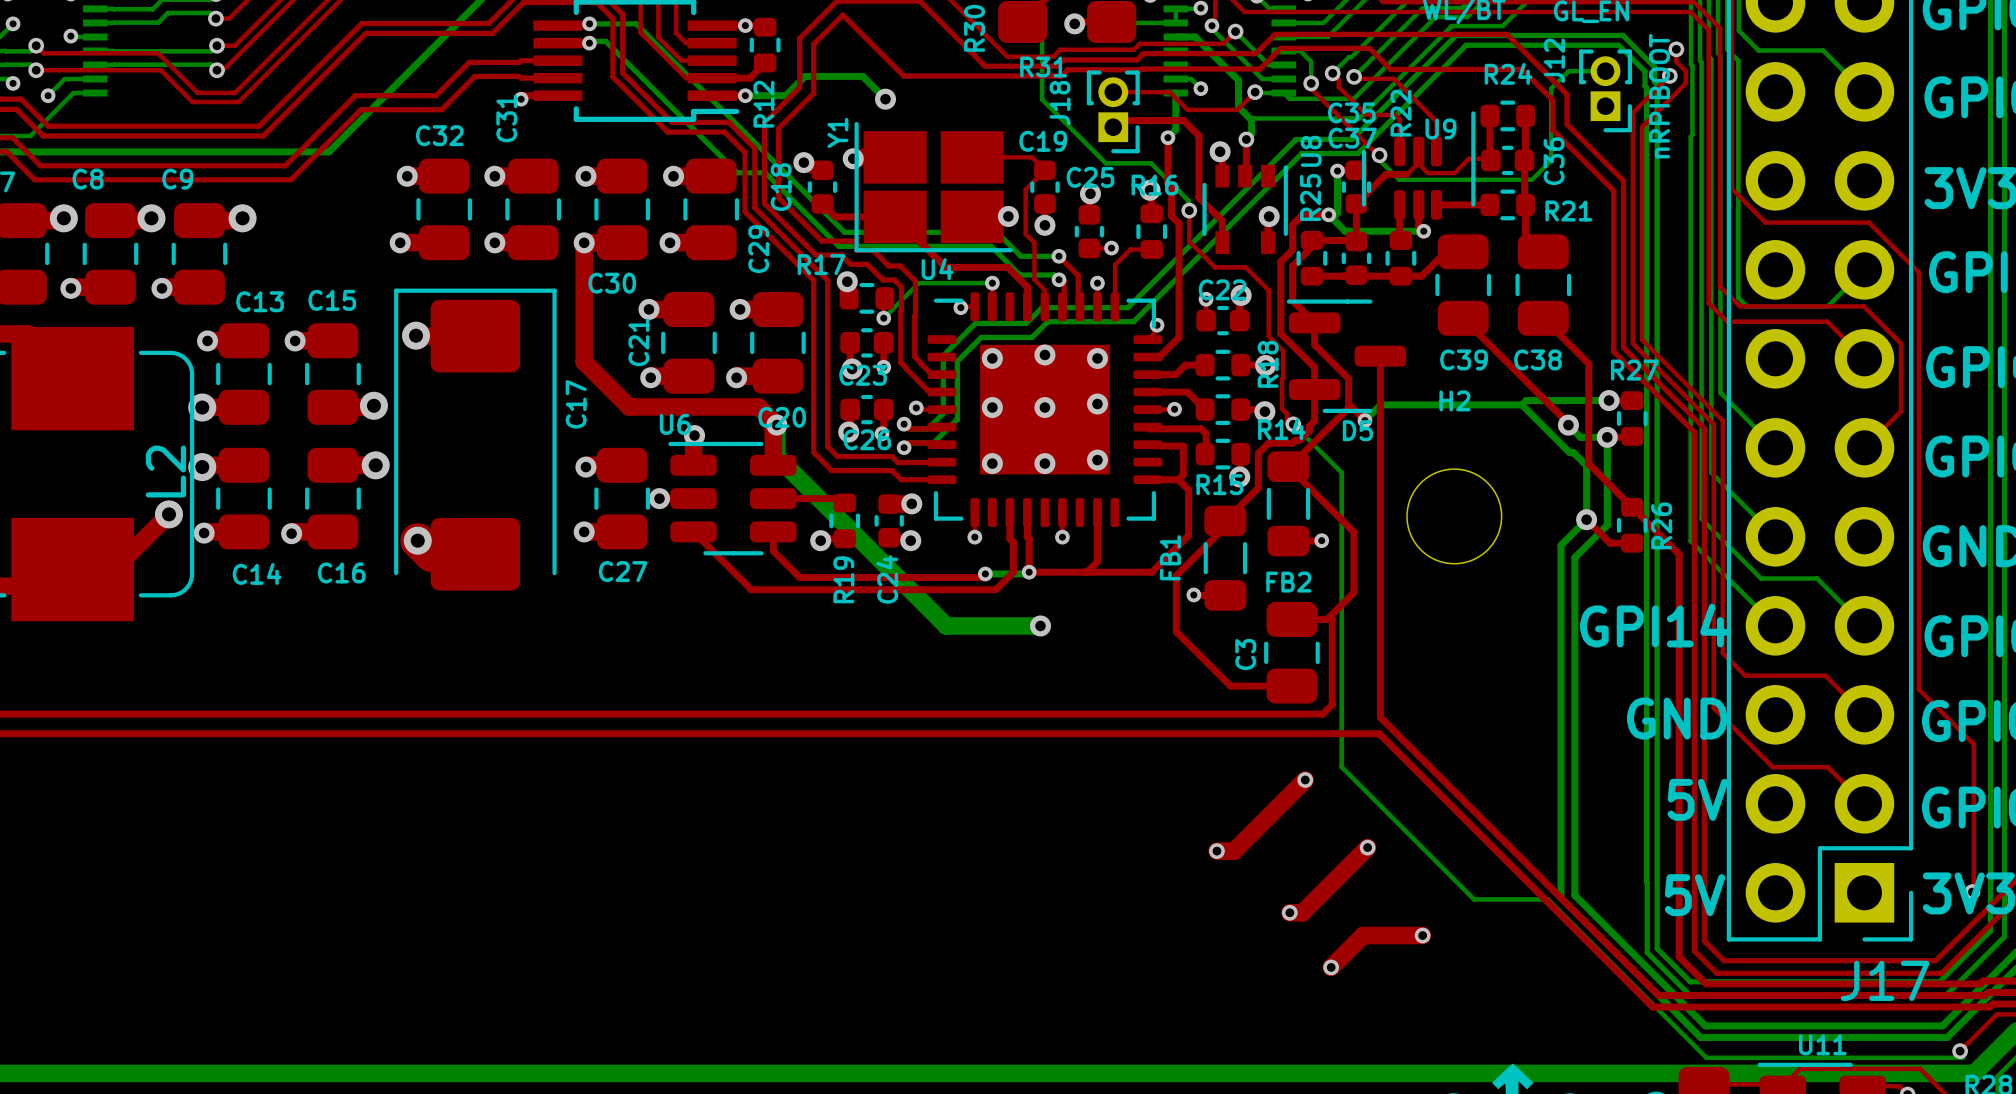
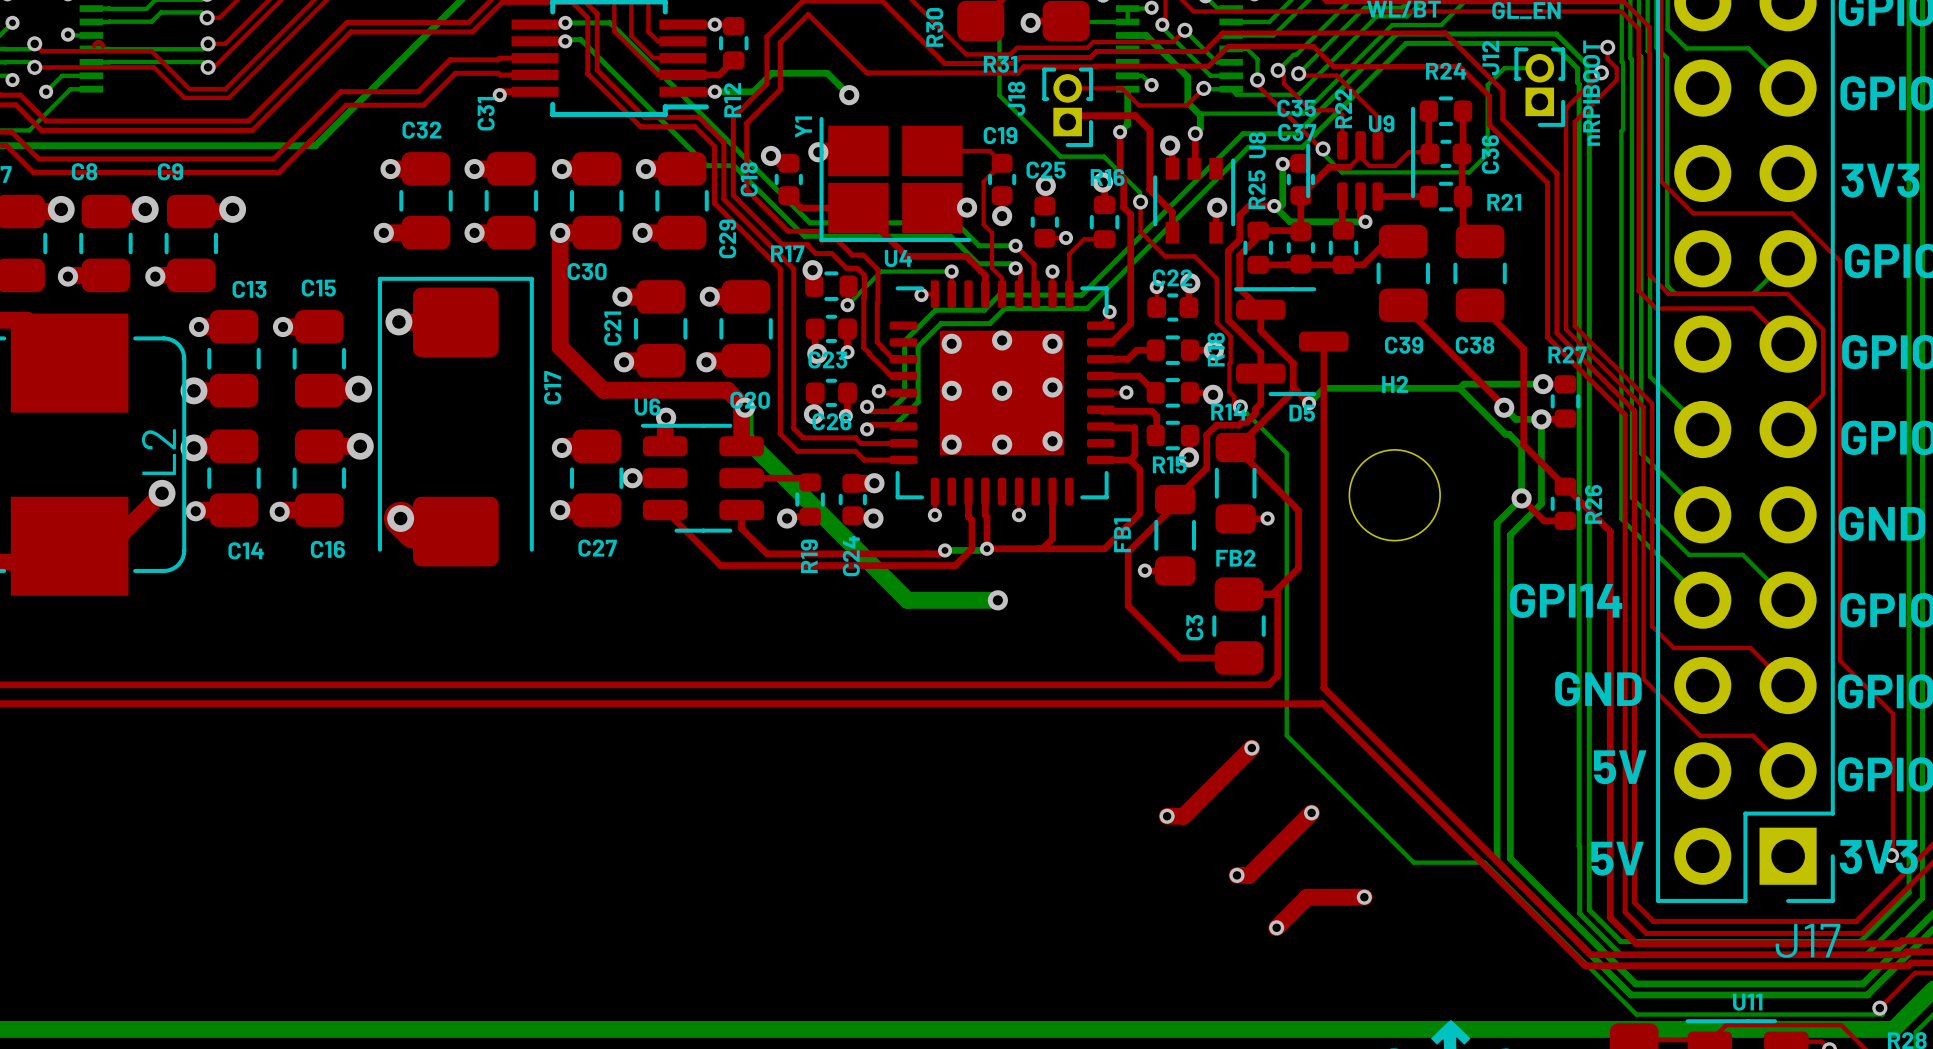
top track: none -> (94, 46) (98, 42) (102, 46)

